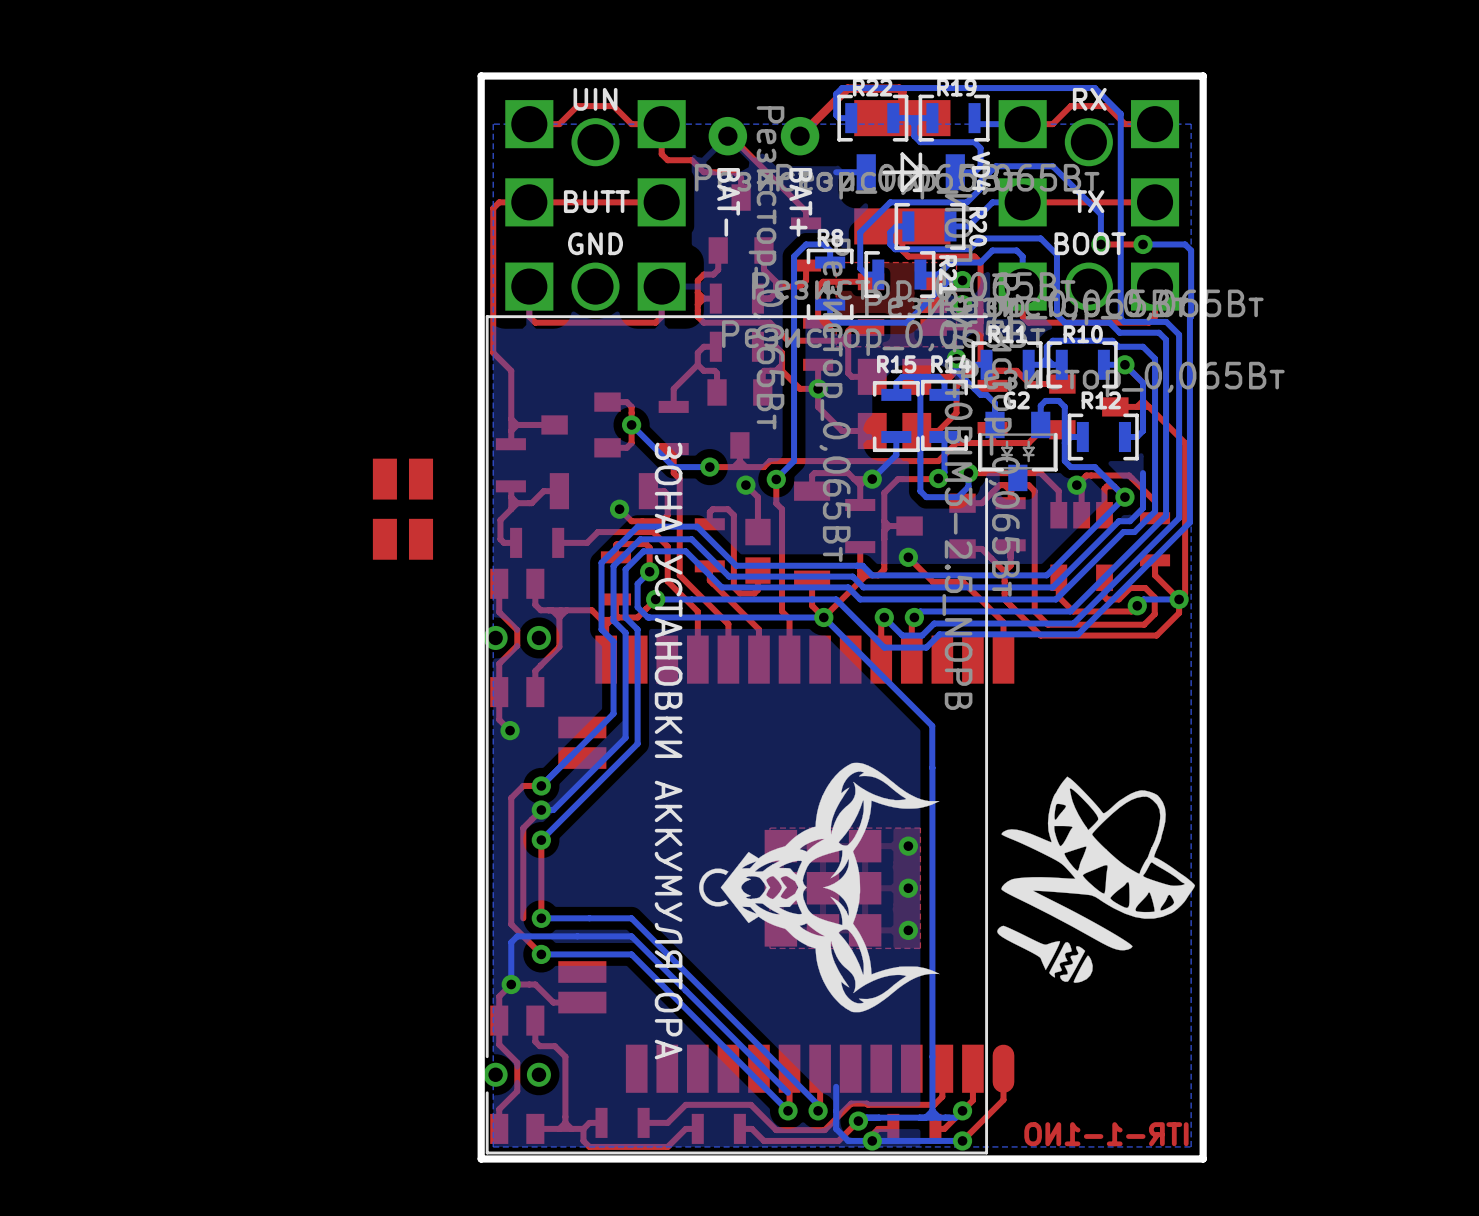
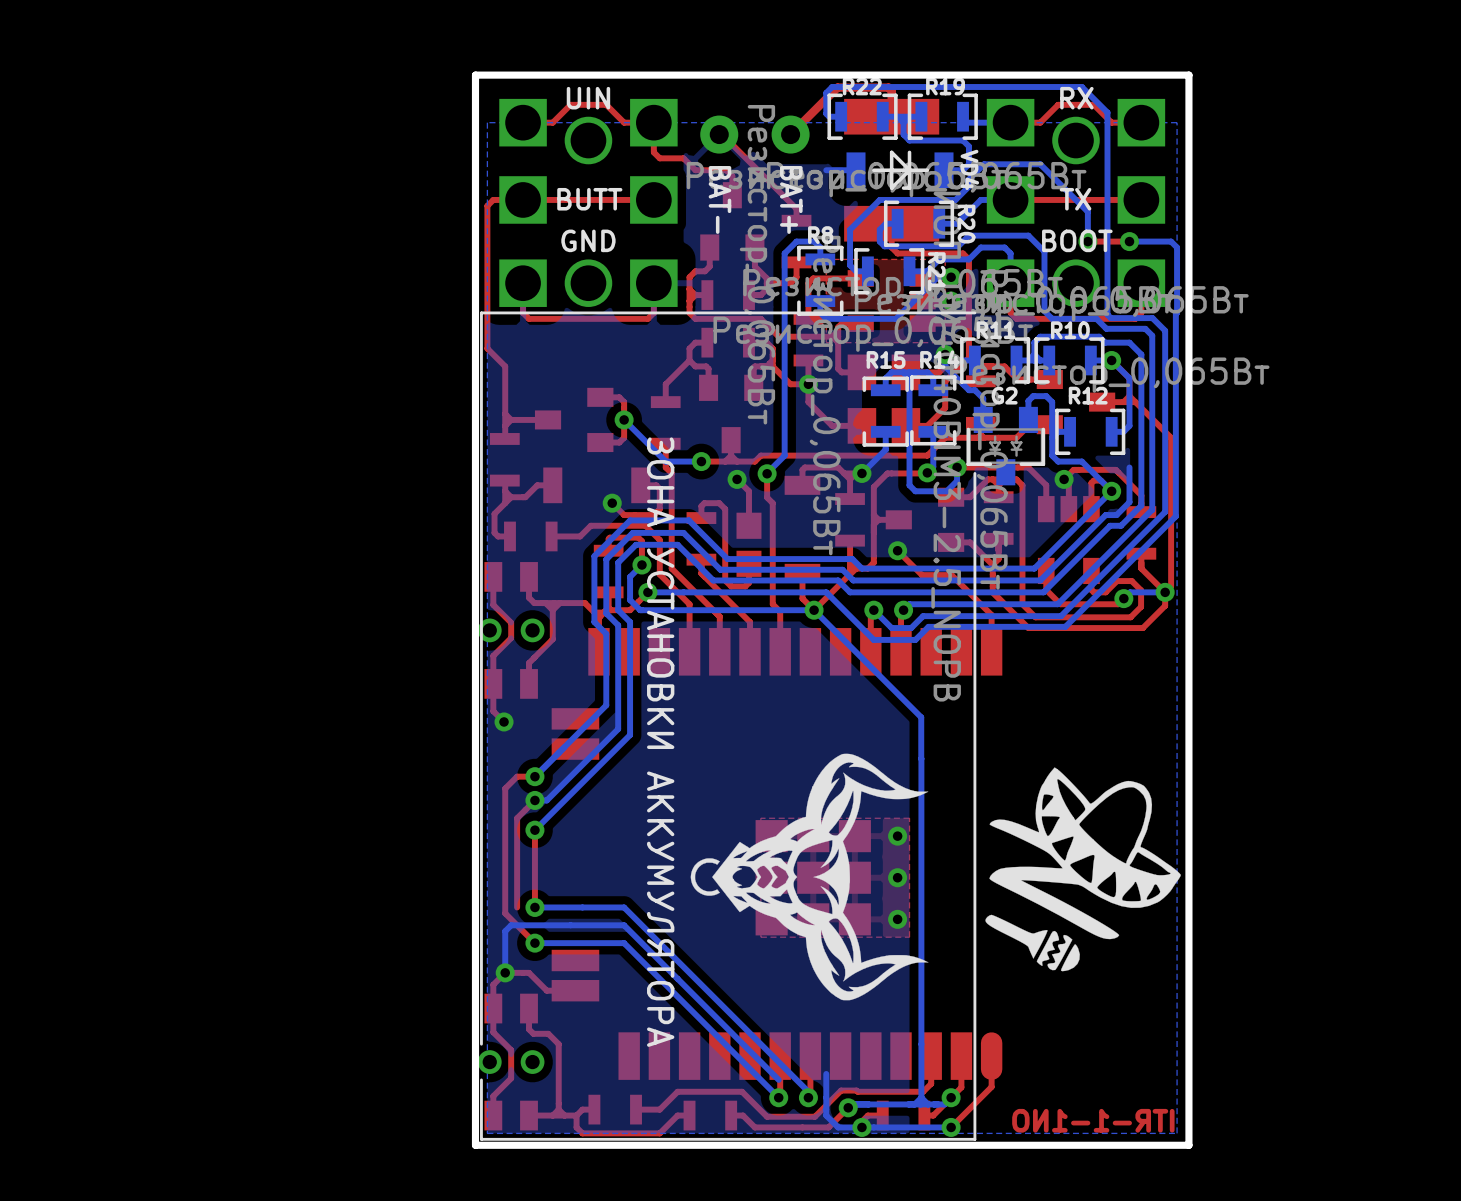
part: (402, 509) -> none

